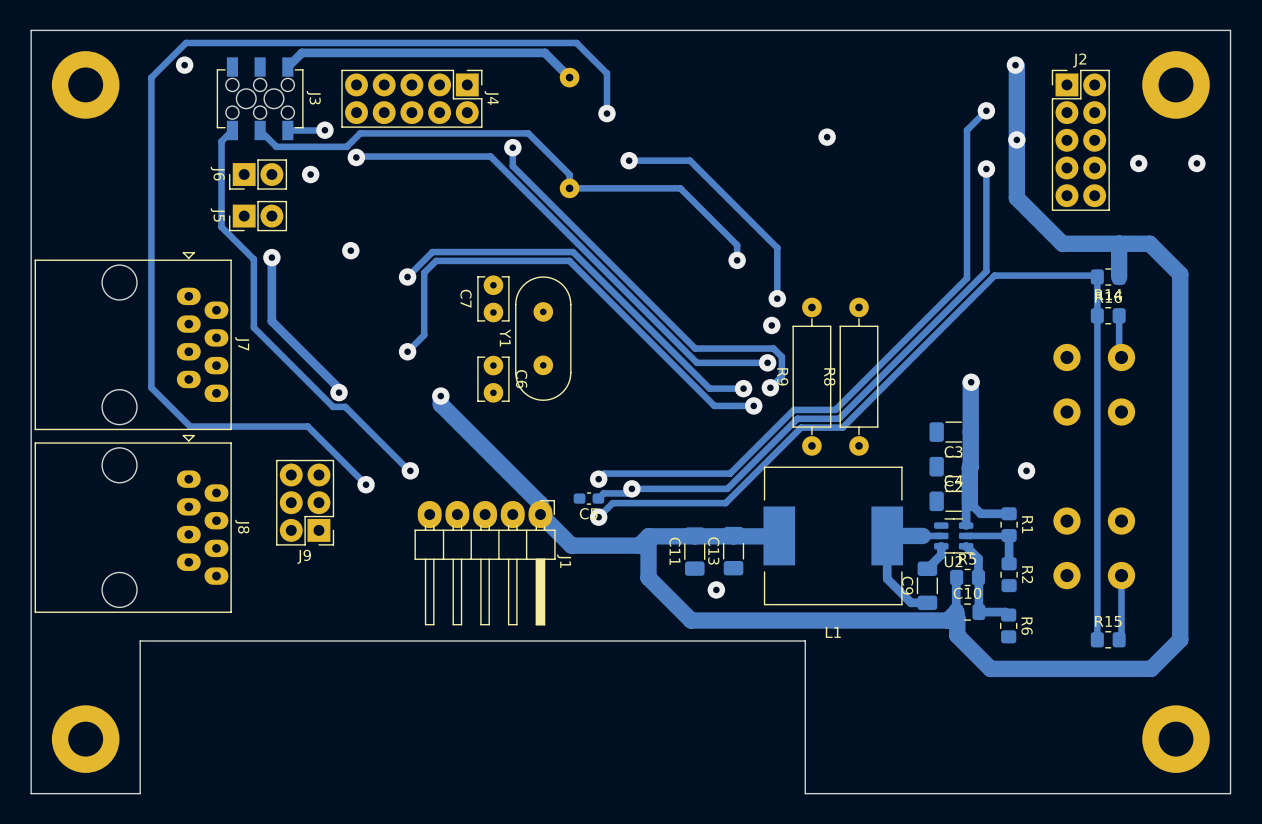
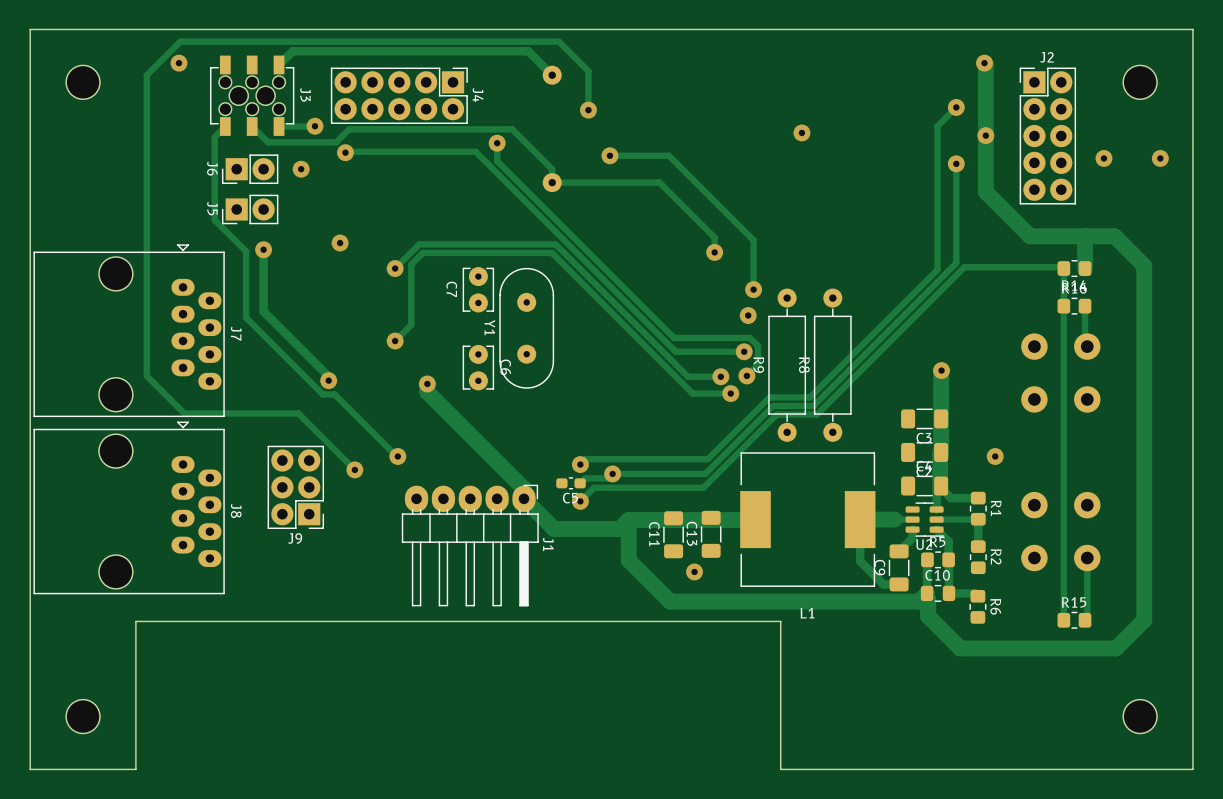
part footprint: [51, 51, 120, 119] -> [66, 65, 100, 100]
part footprint: [1142, 51, 1210, 119] -> [1123, 65, 1158, 100]
part footprint: [51, 705, 120, 773] -> [66, 699, 100, 734]
part footprint: [1142, 705, 1210, 773] -> [1123, 699, 1158, 734]

